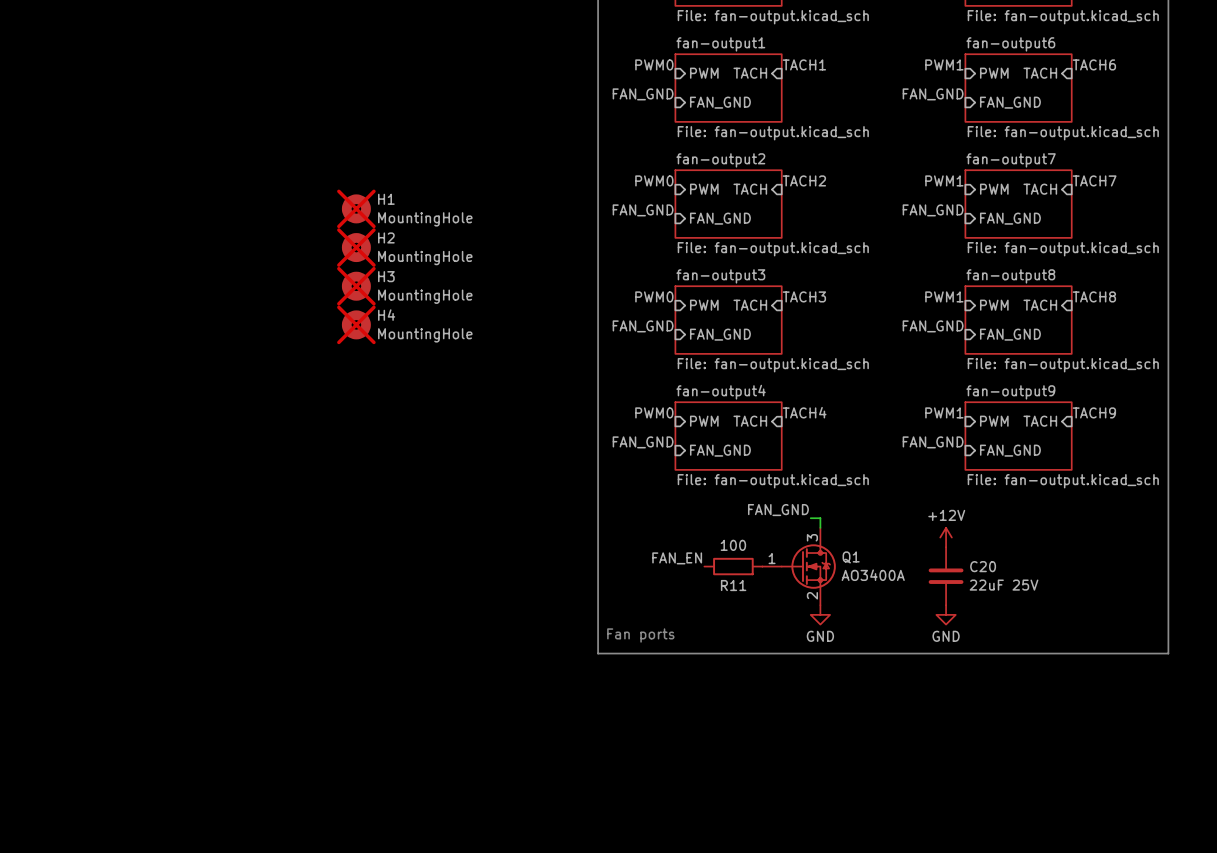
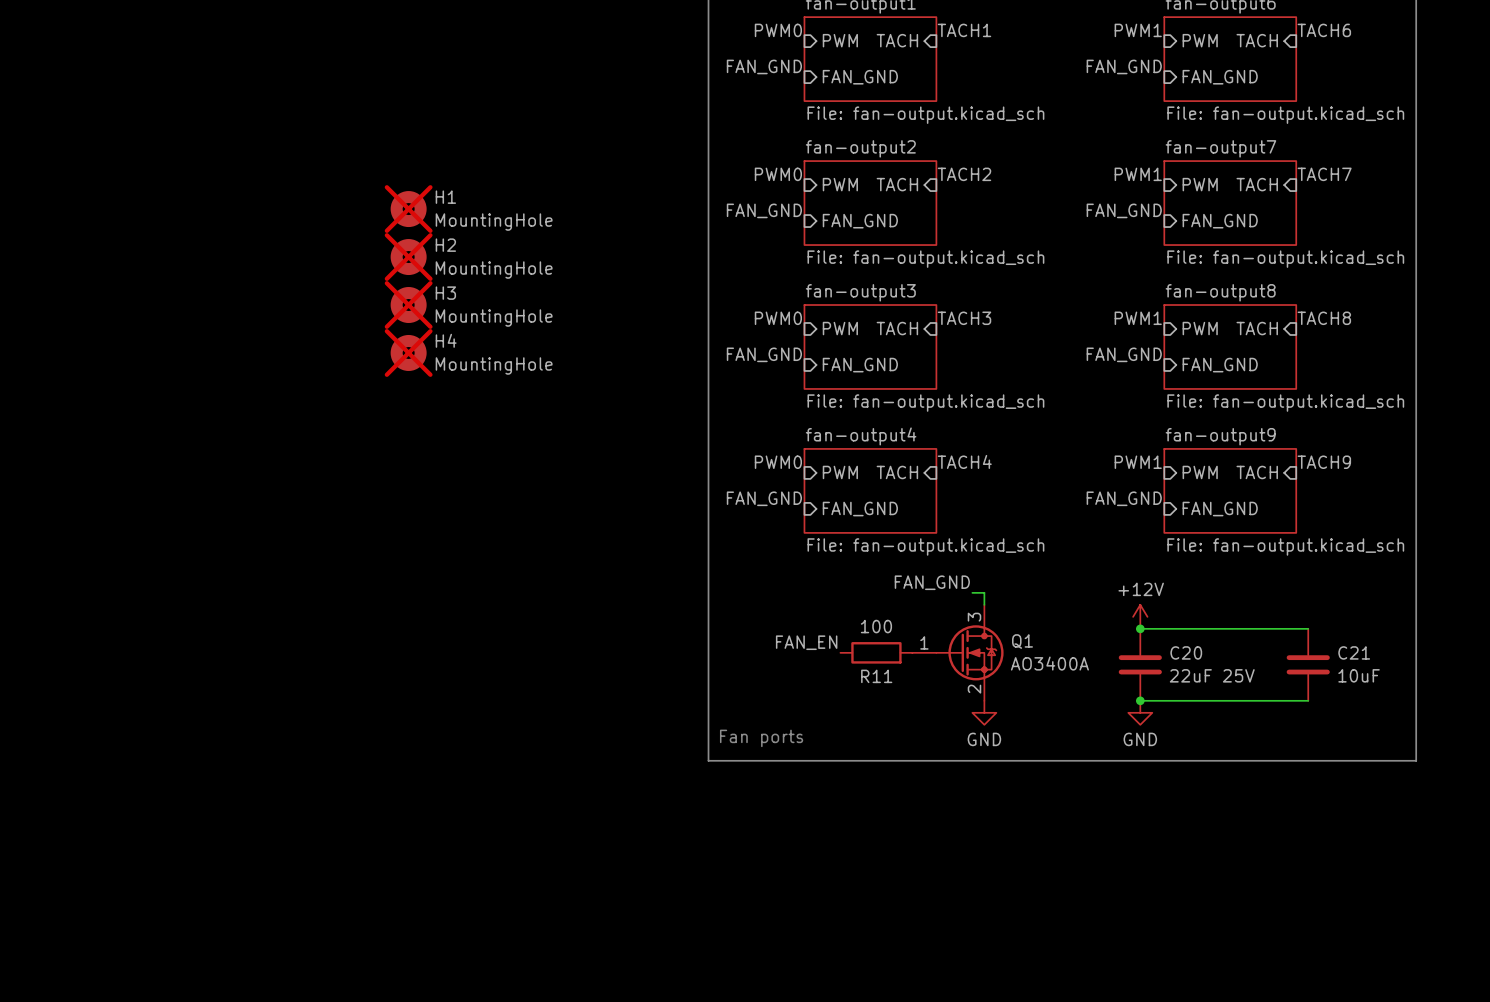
wire: none -> (1140, 628) (1308, 628)
junction: none -> (1140, 628)
C21: none -> 10uF (1308, 664)
wire: none -> (1140, 700) (1308, 700)
junction: none -> (1140, 700)

